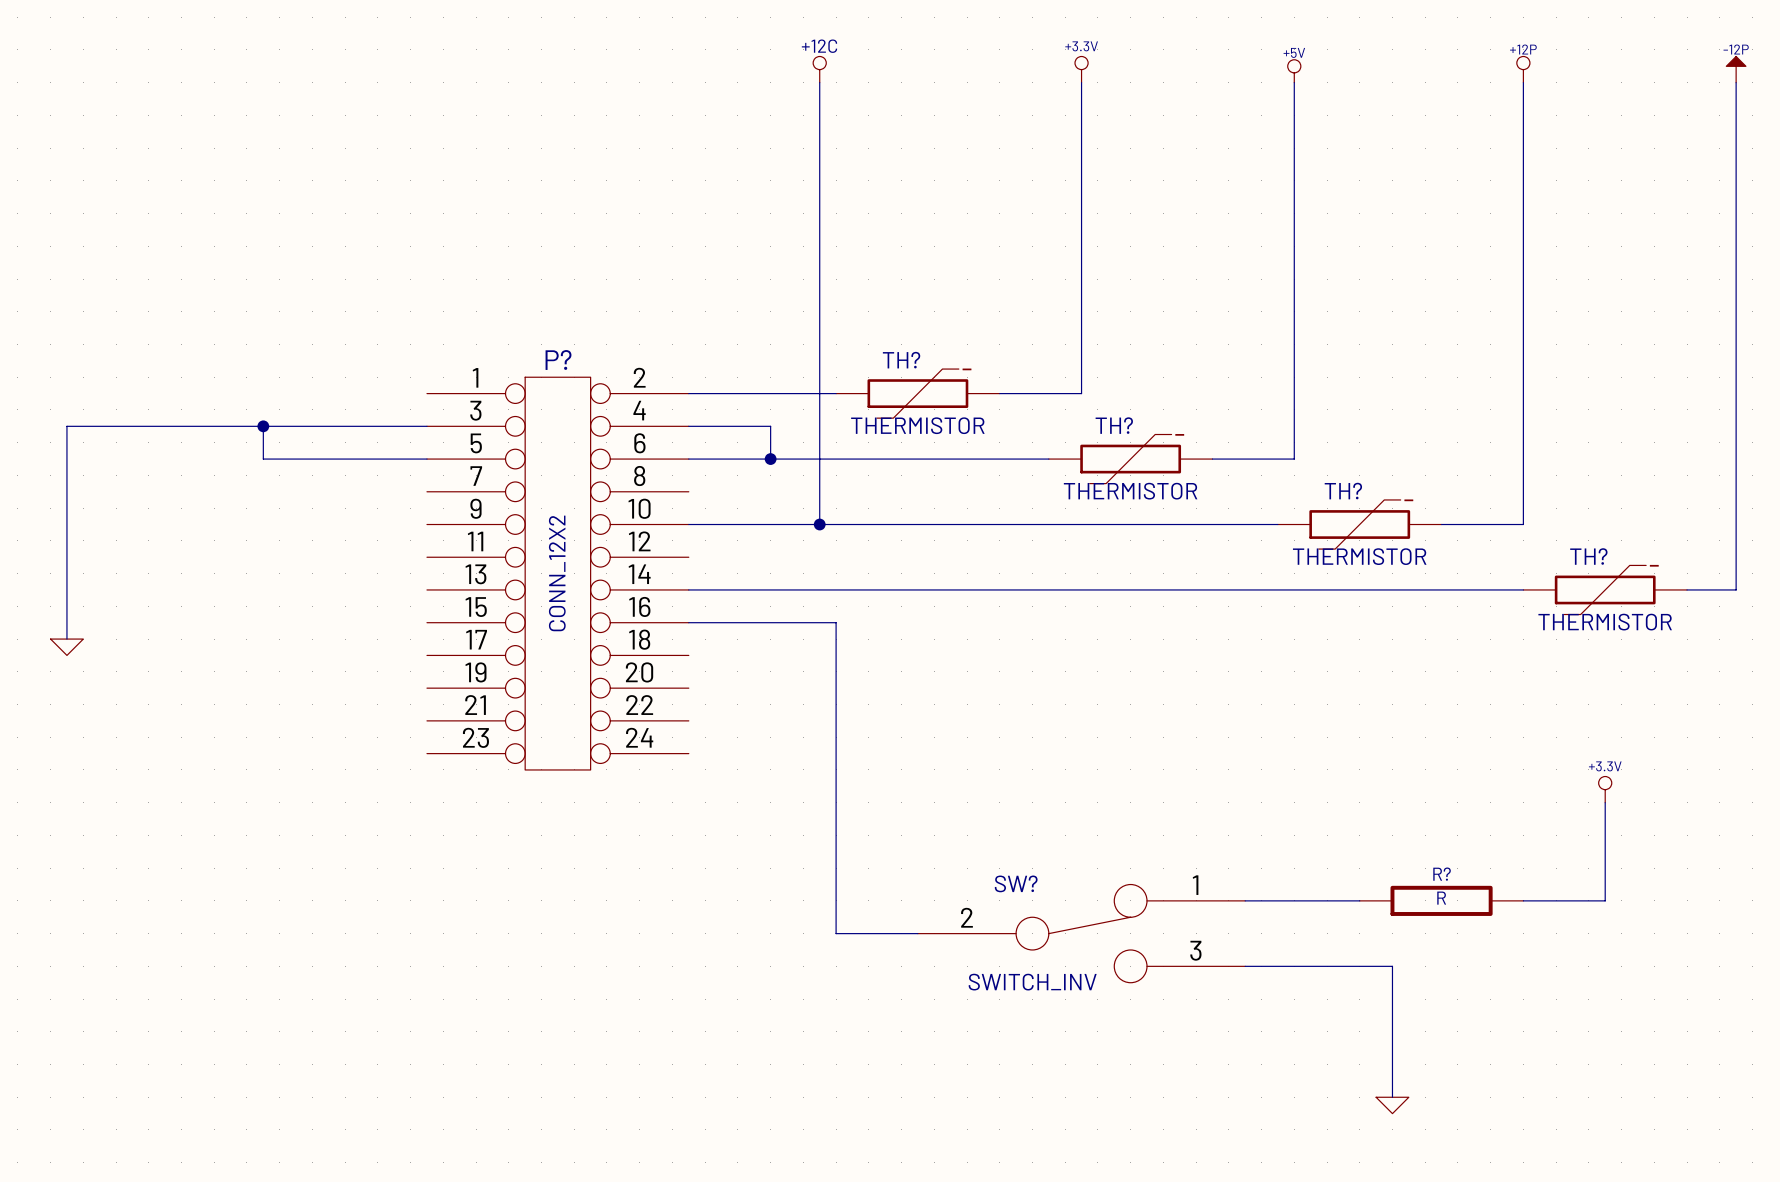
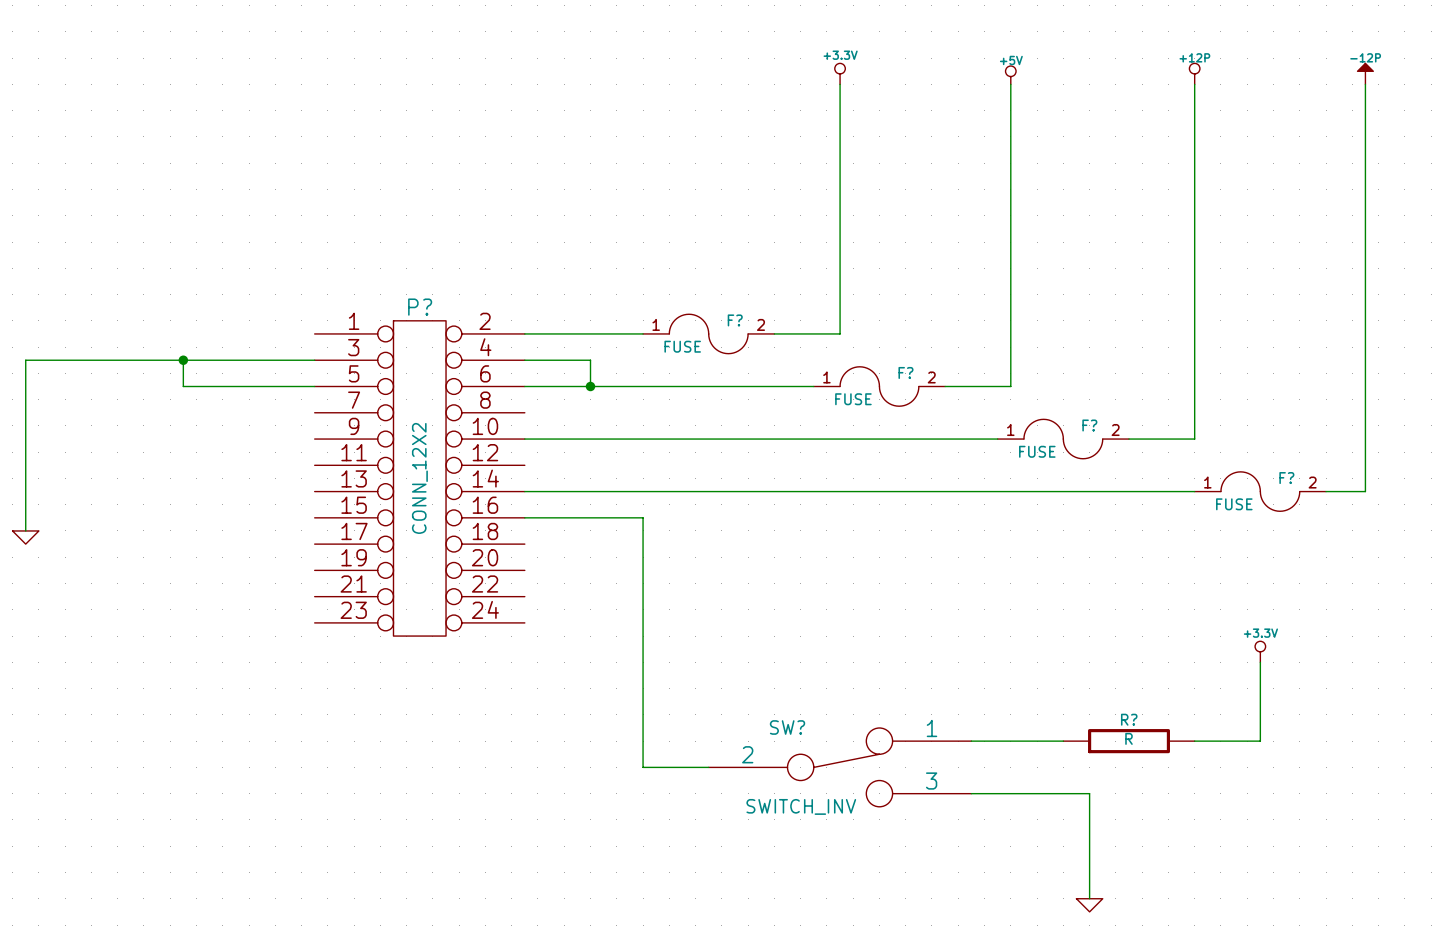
power symbol: +12C (819, 69) -> none
wire: (819, 82) (819, 524) -> none
TH?: THERMISTOR (917, 393) -> none
F?: none -> FUSE (708, 333)
TH?: THERMISTOR (1130, 459) -> none
F?: none -> FUSE (879, 386)
junction: (819, 524) -> none
TH?: THERMISTOR (1359, 524) -> none
F?: none -> FUSE (1063, 439)
TH?: THERMISTOR (1605, 589) -> none
F?: none -> FUSE (1260, 491)

